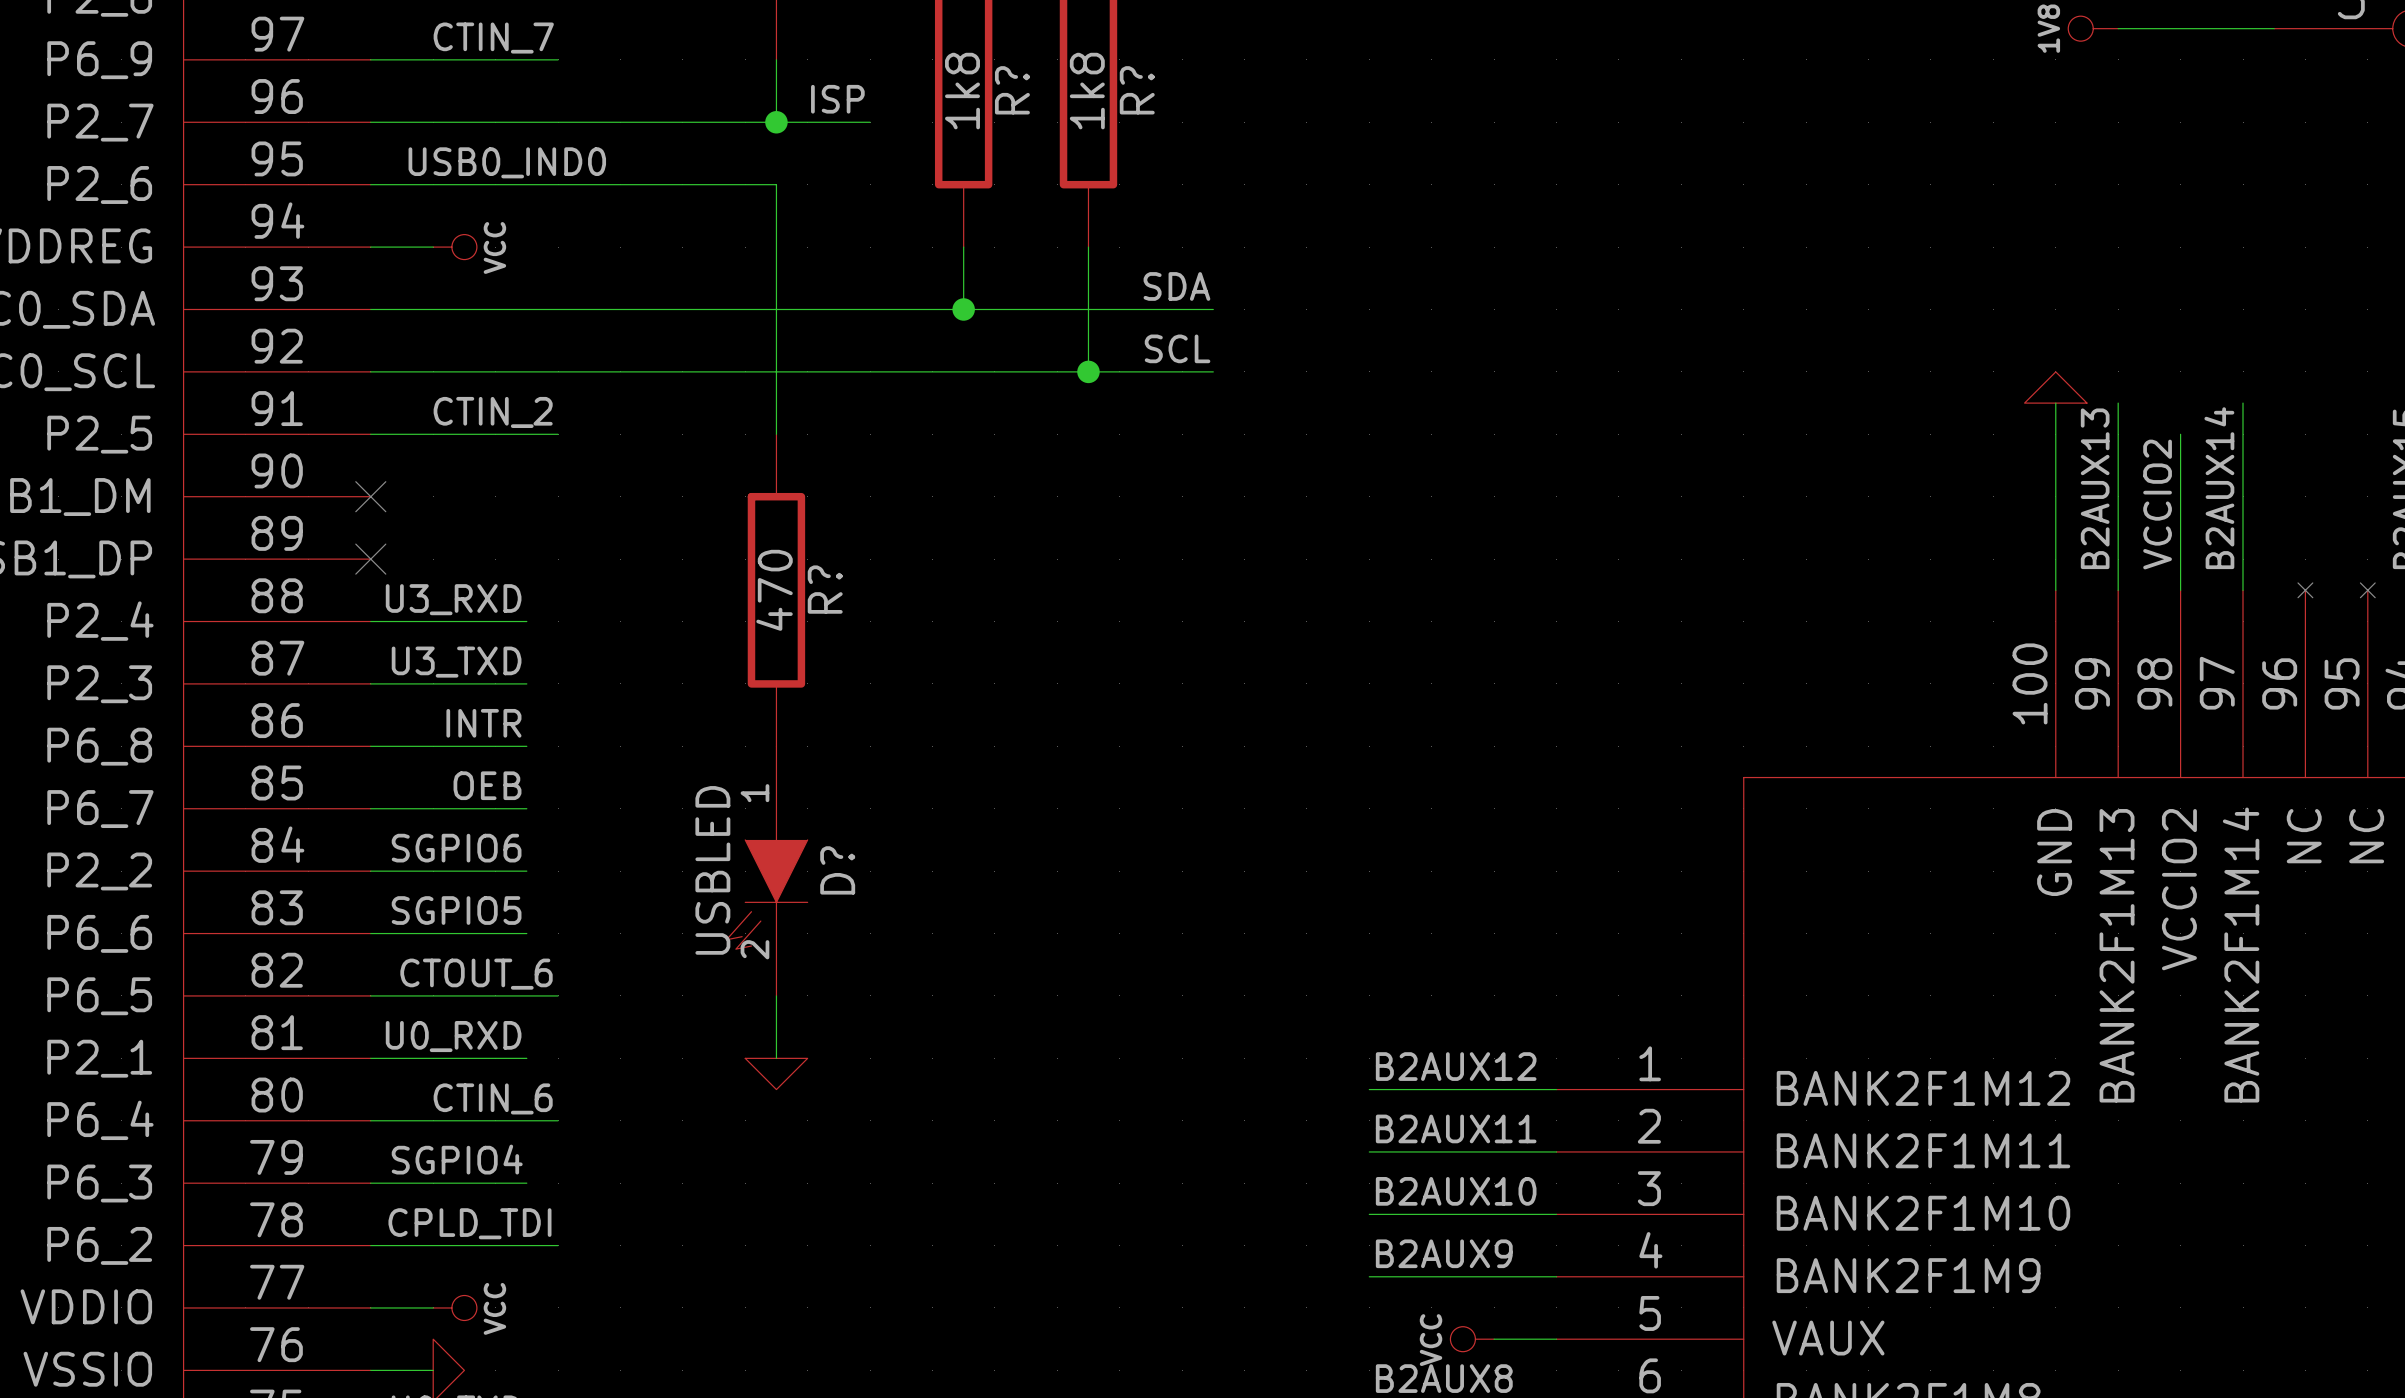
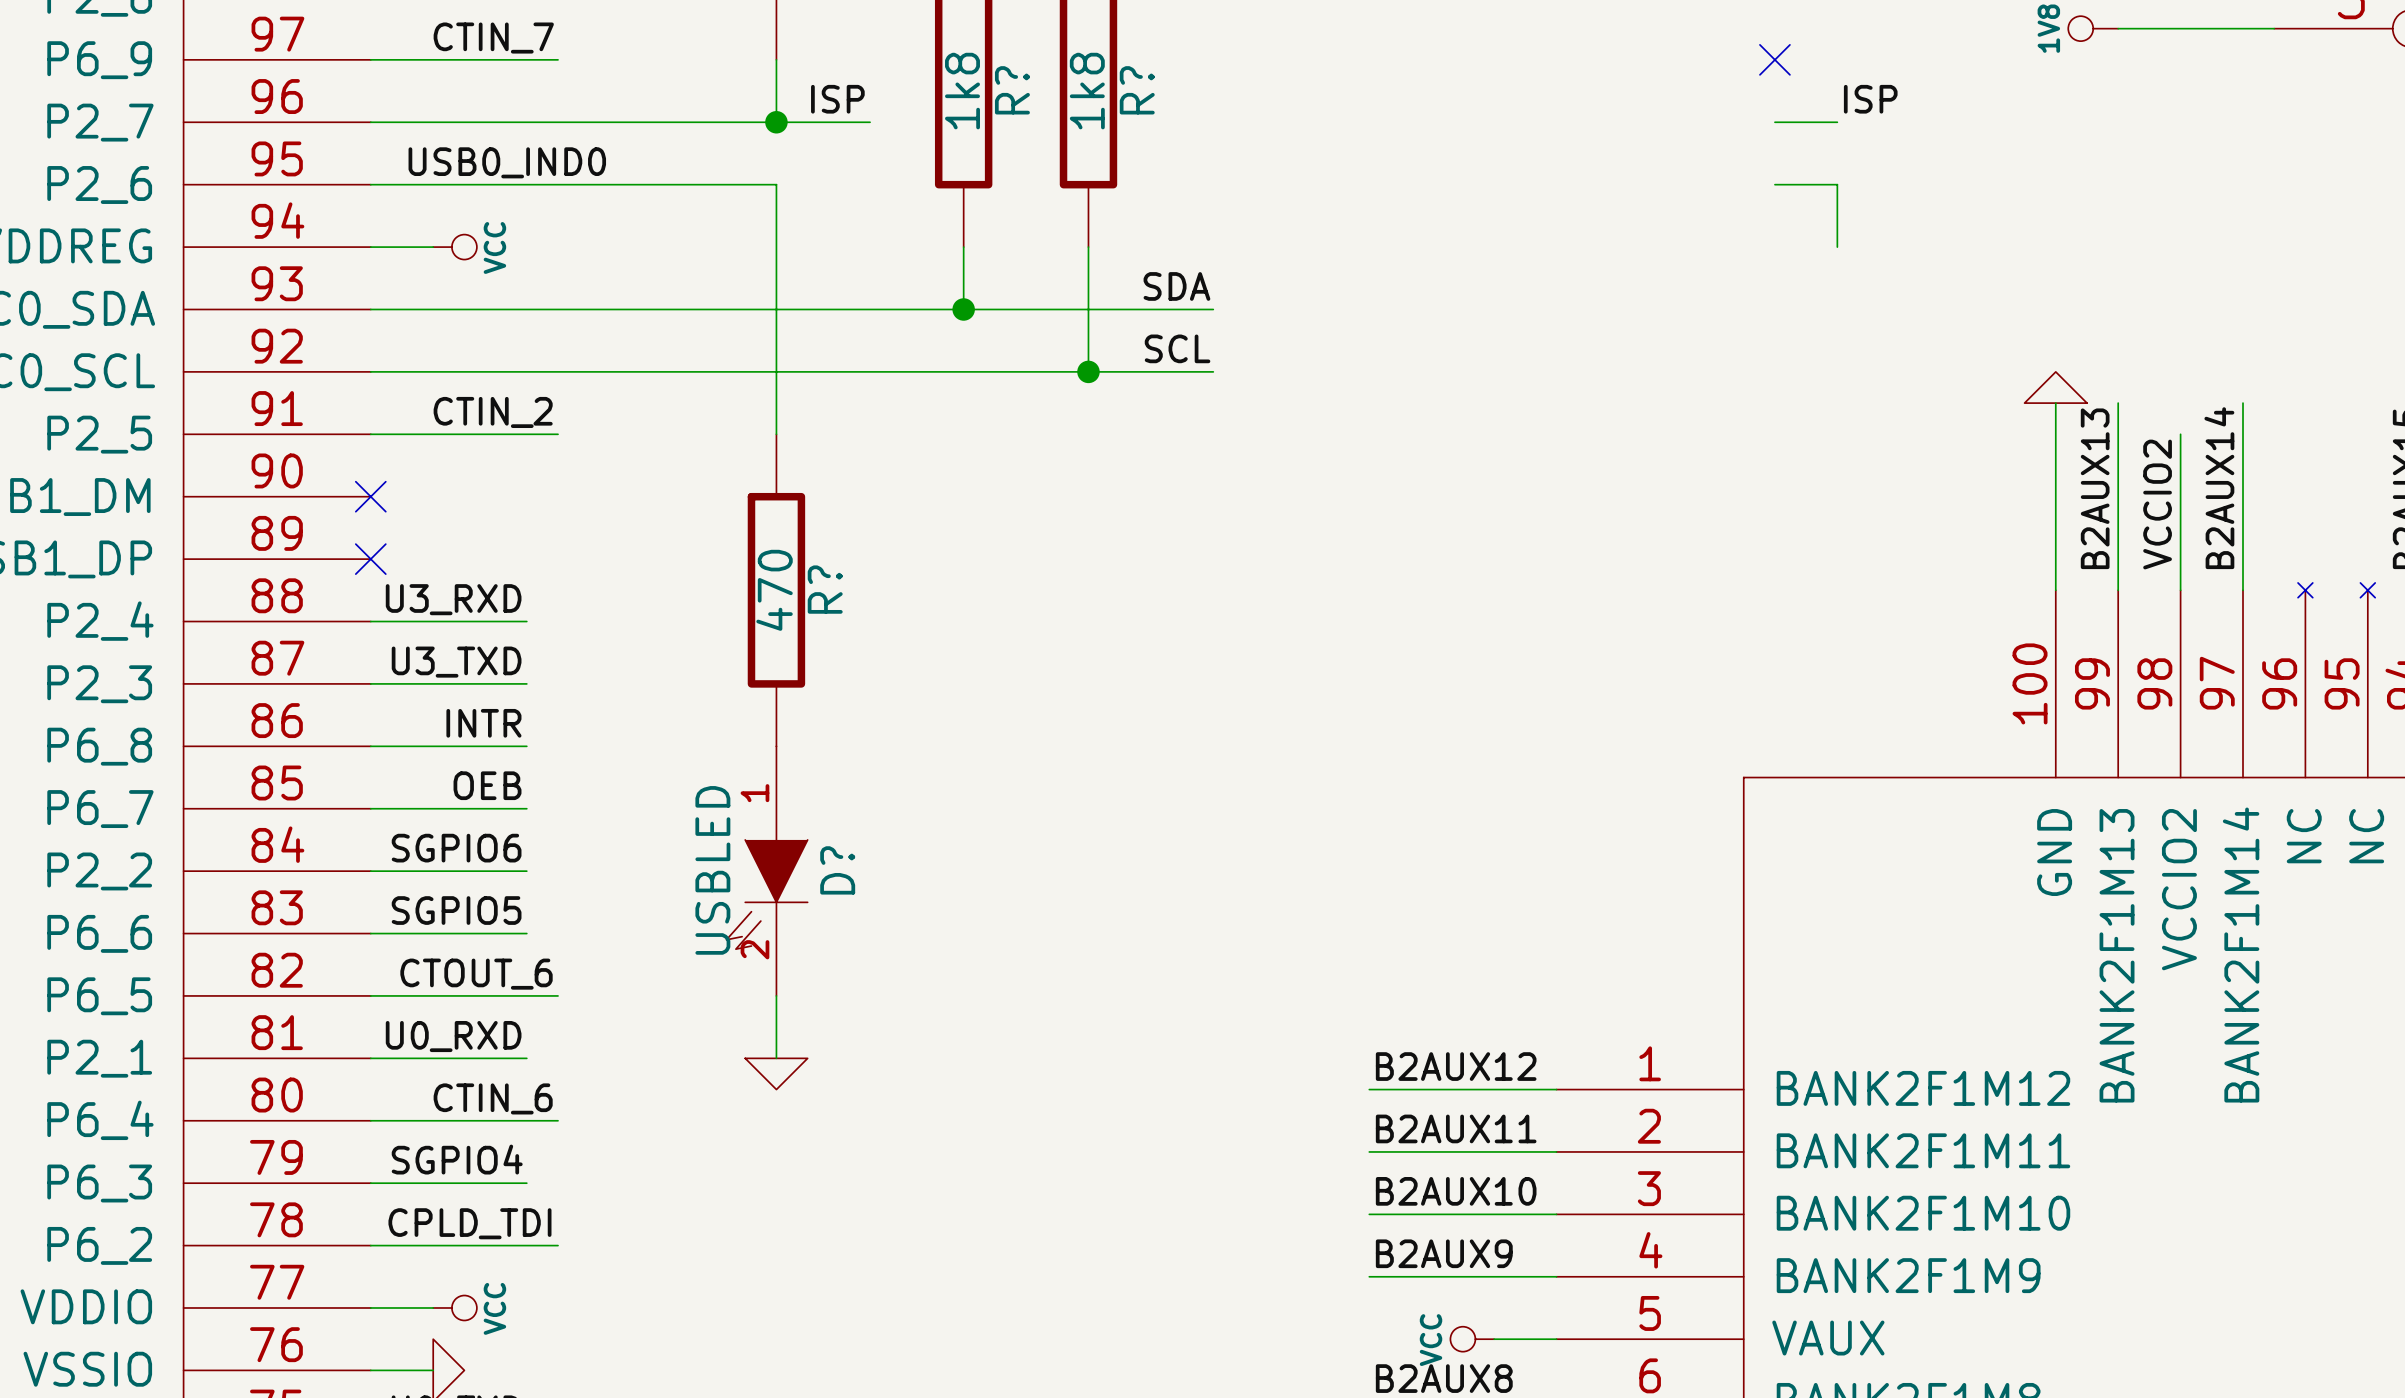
no-connect mark: none -> (1774, 59)
label: none -> ISP (1870, 99)
wire: none -> (1774, 122) (1837, 122)
wire: none -> (1774, 184) (1837, 184) (1837, 247)

